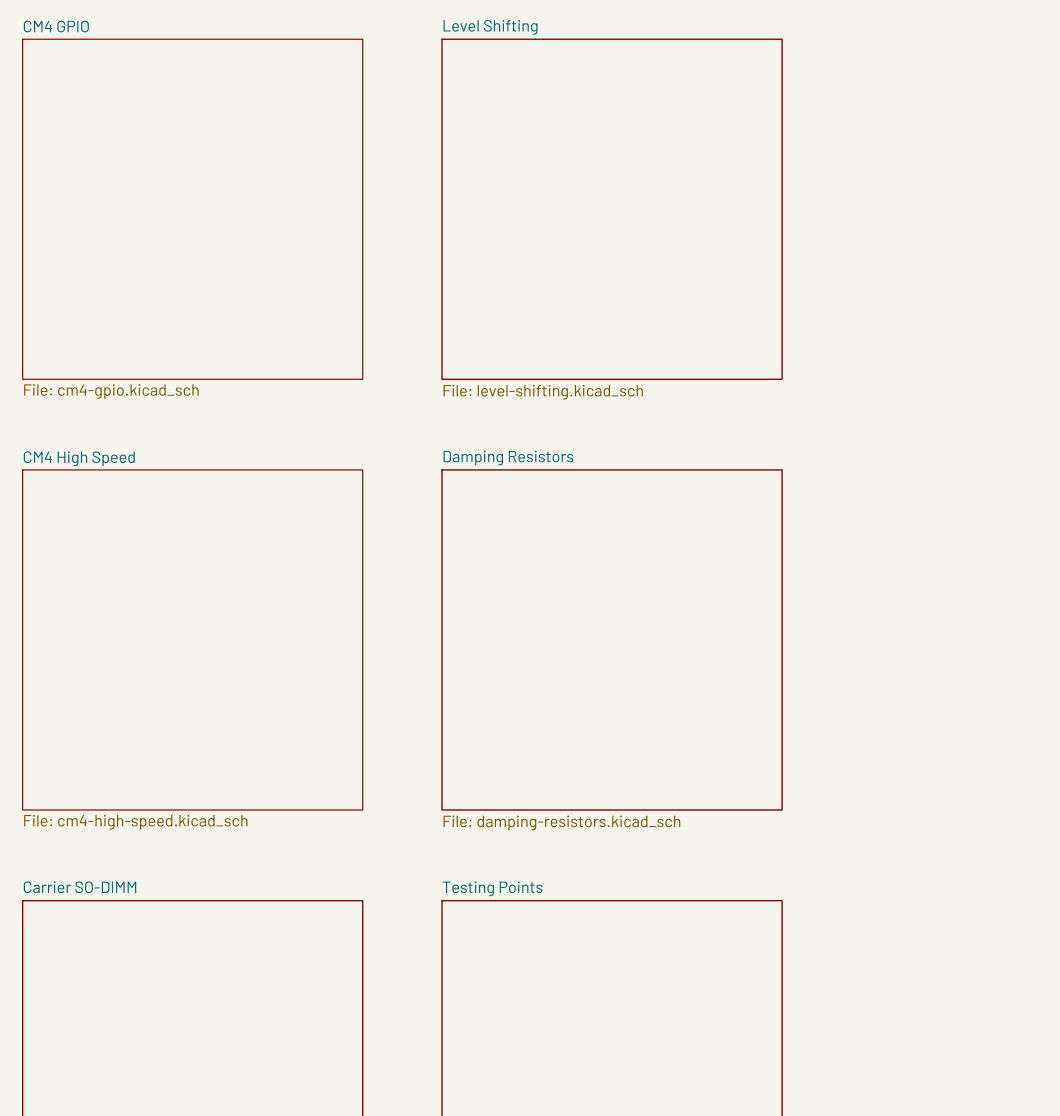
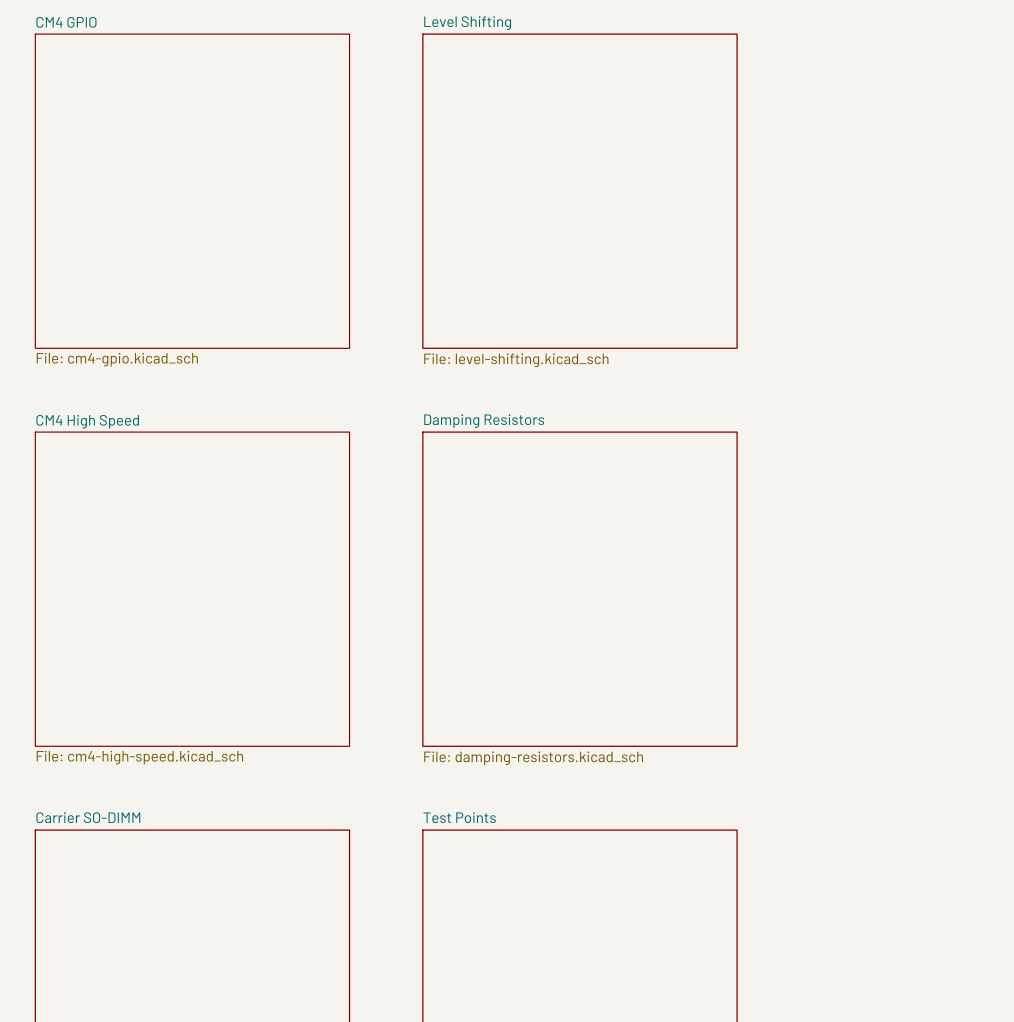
sheet Testing Points name: Testing Points (492, 888) -> Test Points (459, 817)

